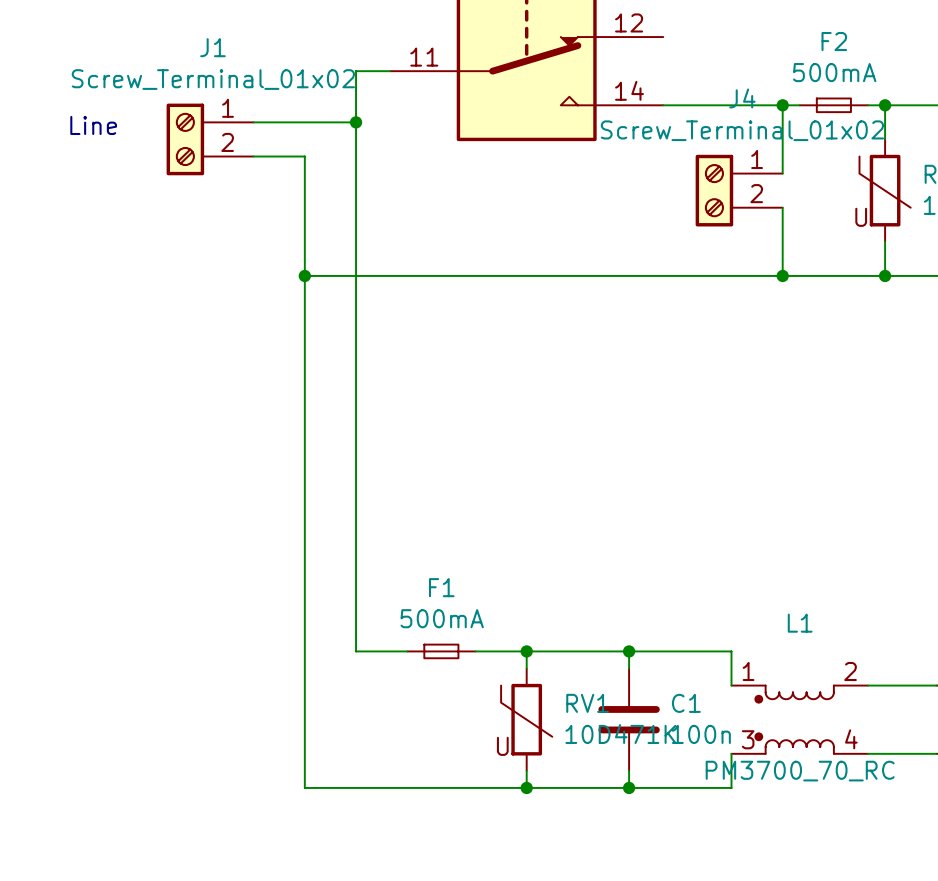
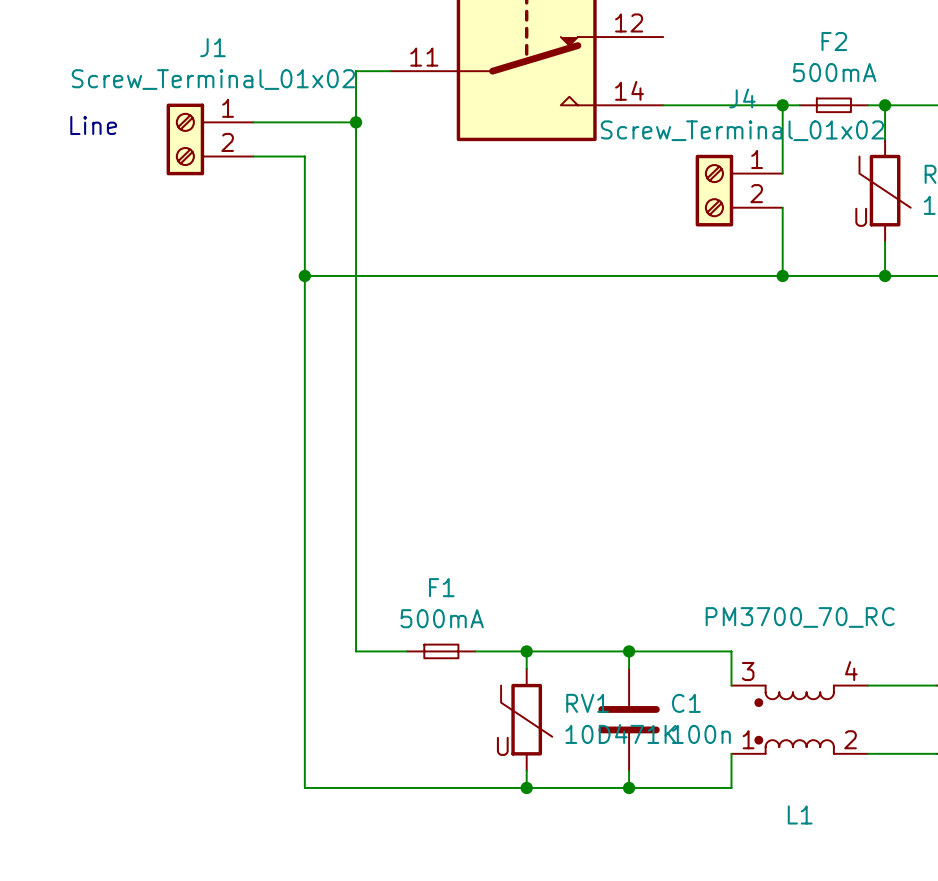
L1 flip: as is (794, 719) -> up-down (794, 719)
L1 value position: PM3700_70_RC (800, 771) -> PM3700_70_RC (800, 617)

